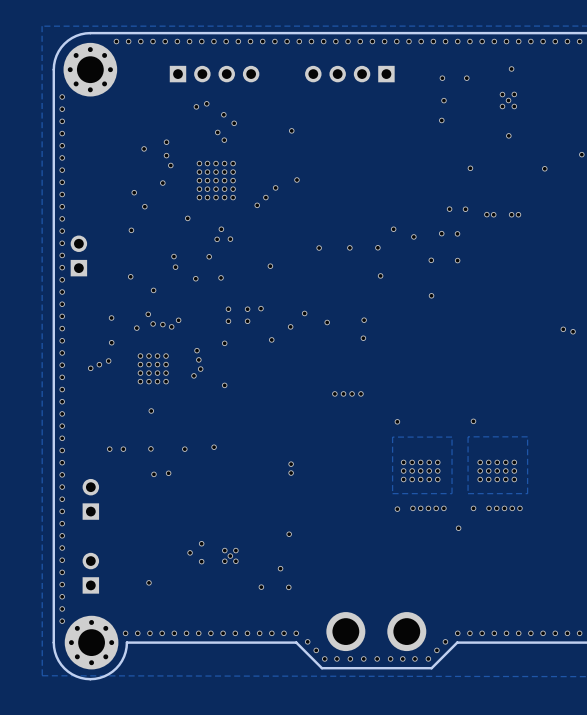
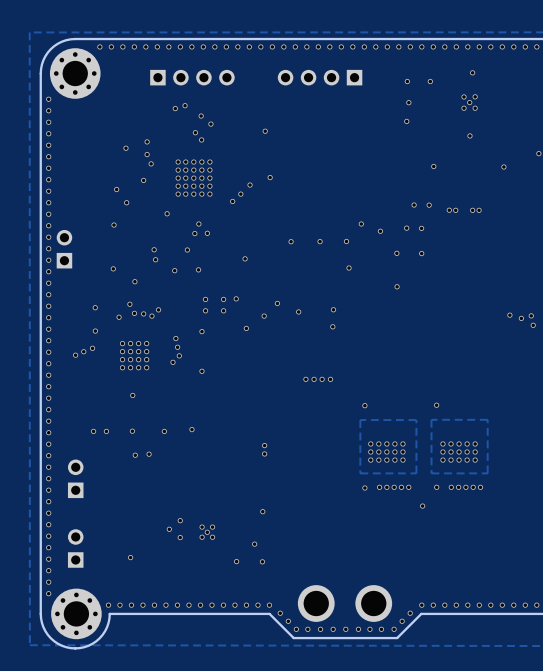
via: none -> (509, 315)
via: none -> (531, 315)
via: (573, 331) -> none
via: none -> (533, 325)

